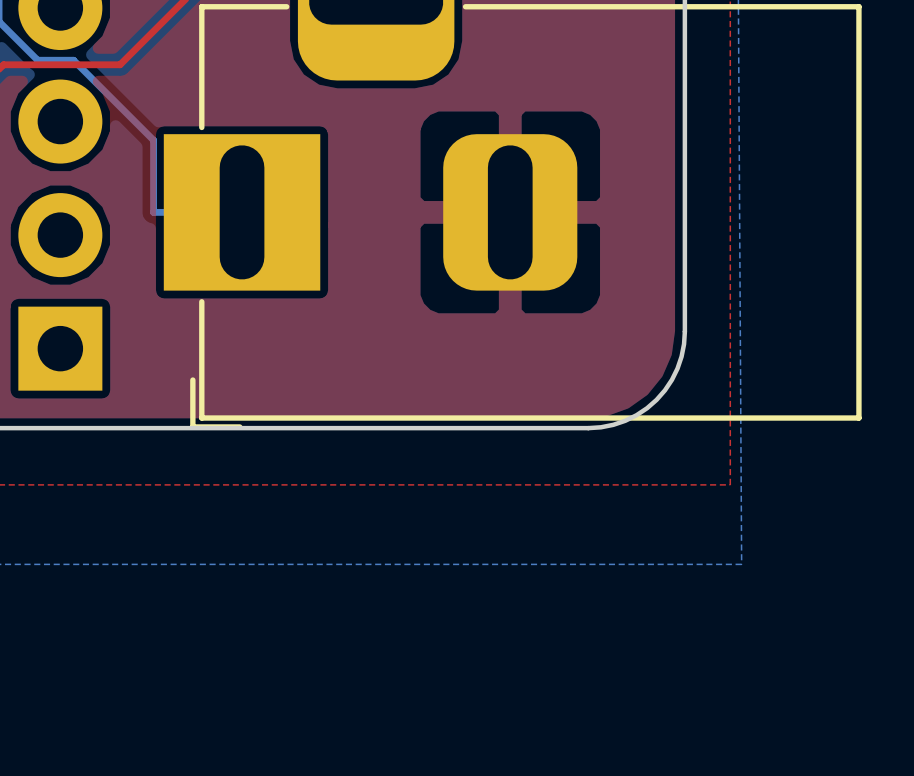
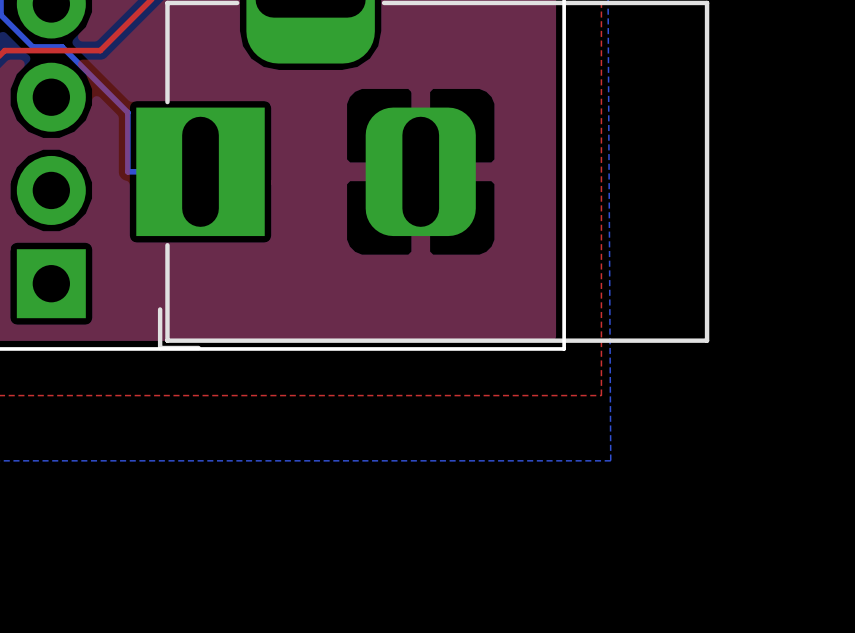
board edge: (684, 331) (684, 344) (677, 368) (671, 379) (656, 399) (647, 408) (625, 420) (600, 427) (588, 428) -> (564, 269) (564, 348) (484, 348)

